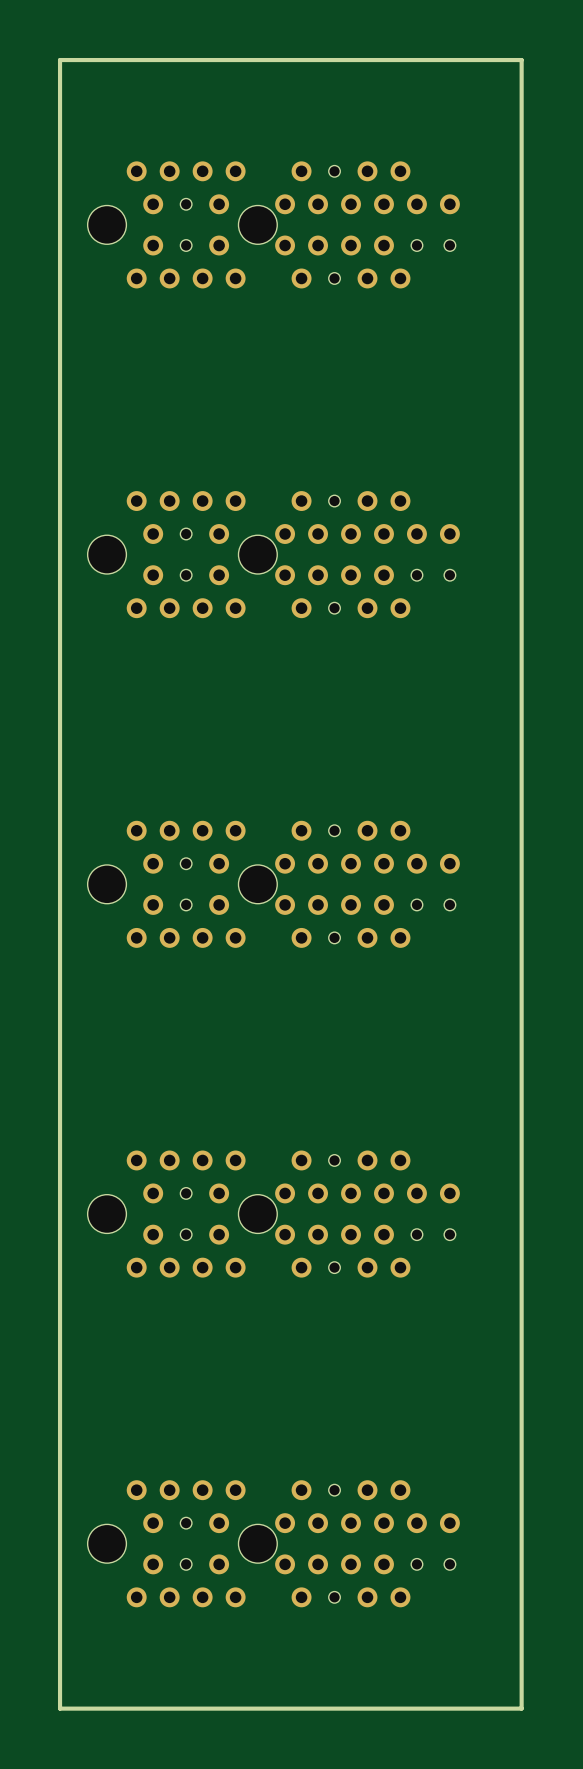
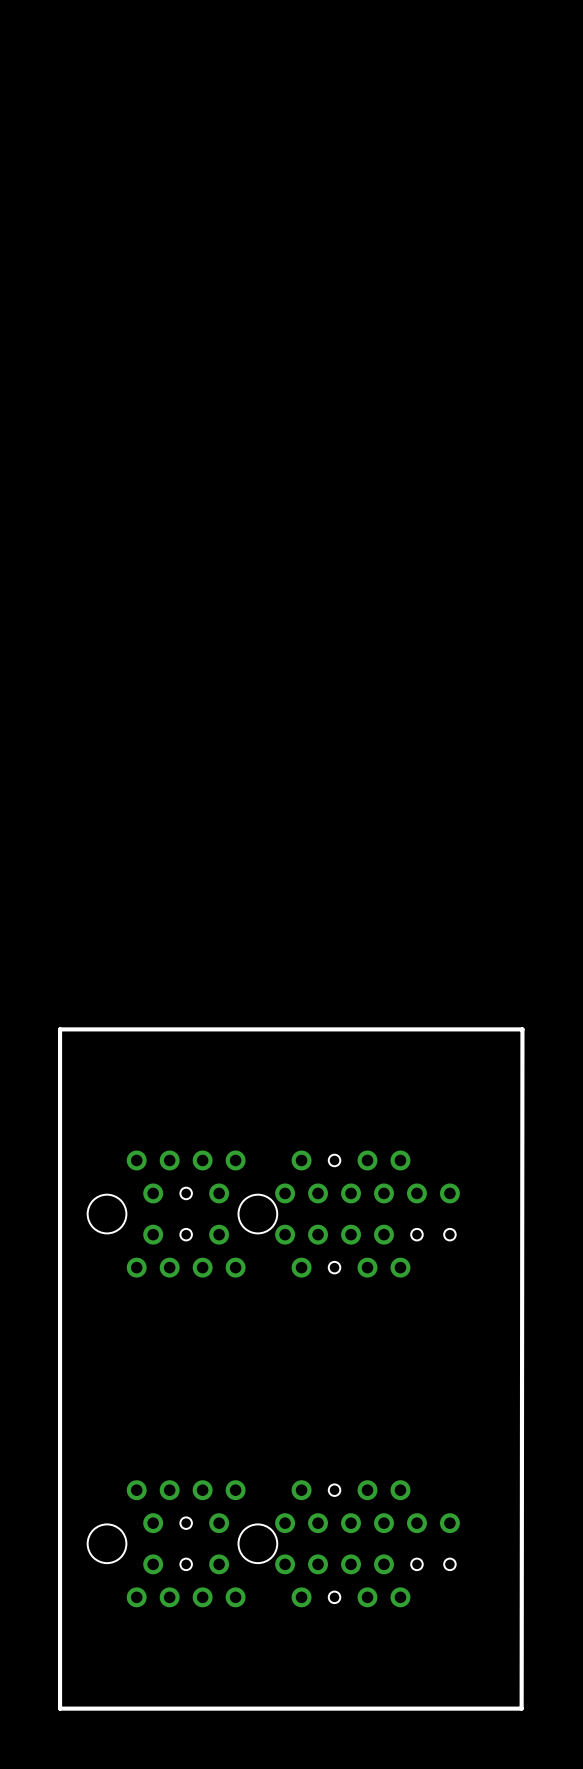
part: (273, 224) -> none
part: (273, 554) -> none
part: (273, 884) -> none
board edge: (60, 1029) (60, 60) (521, 60) (521, 1708) -> (60, 1029) (522, 1029) (521, 1708)

